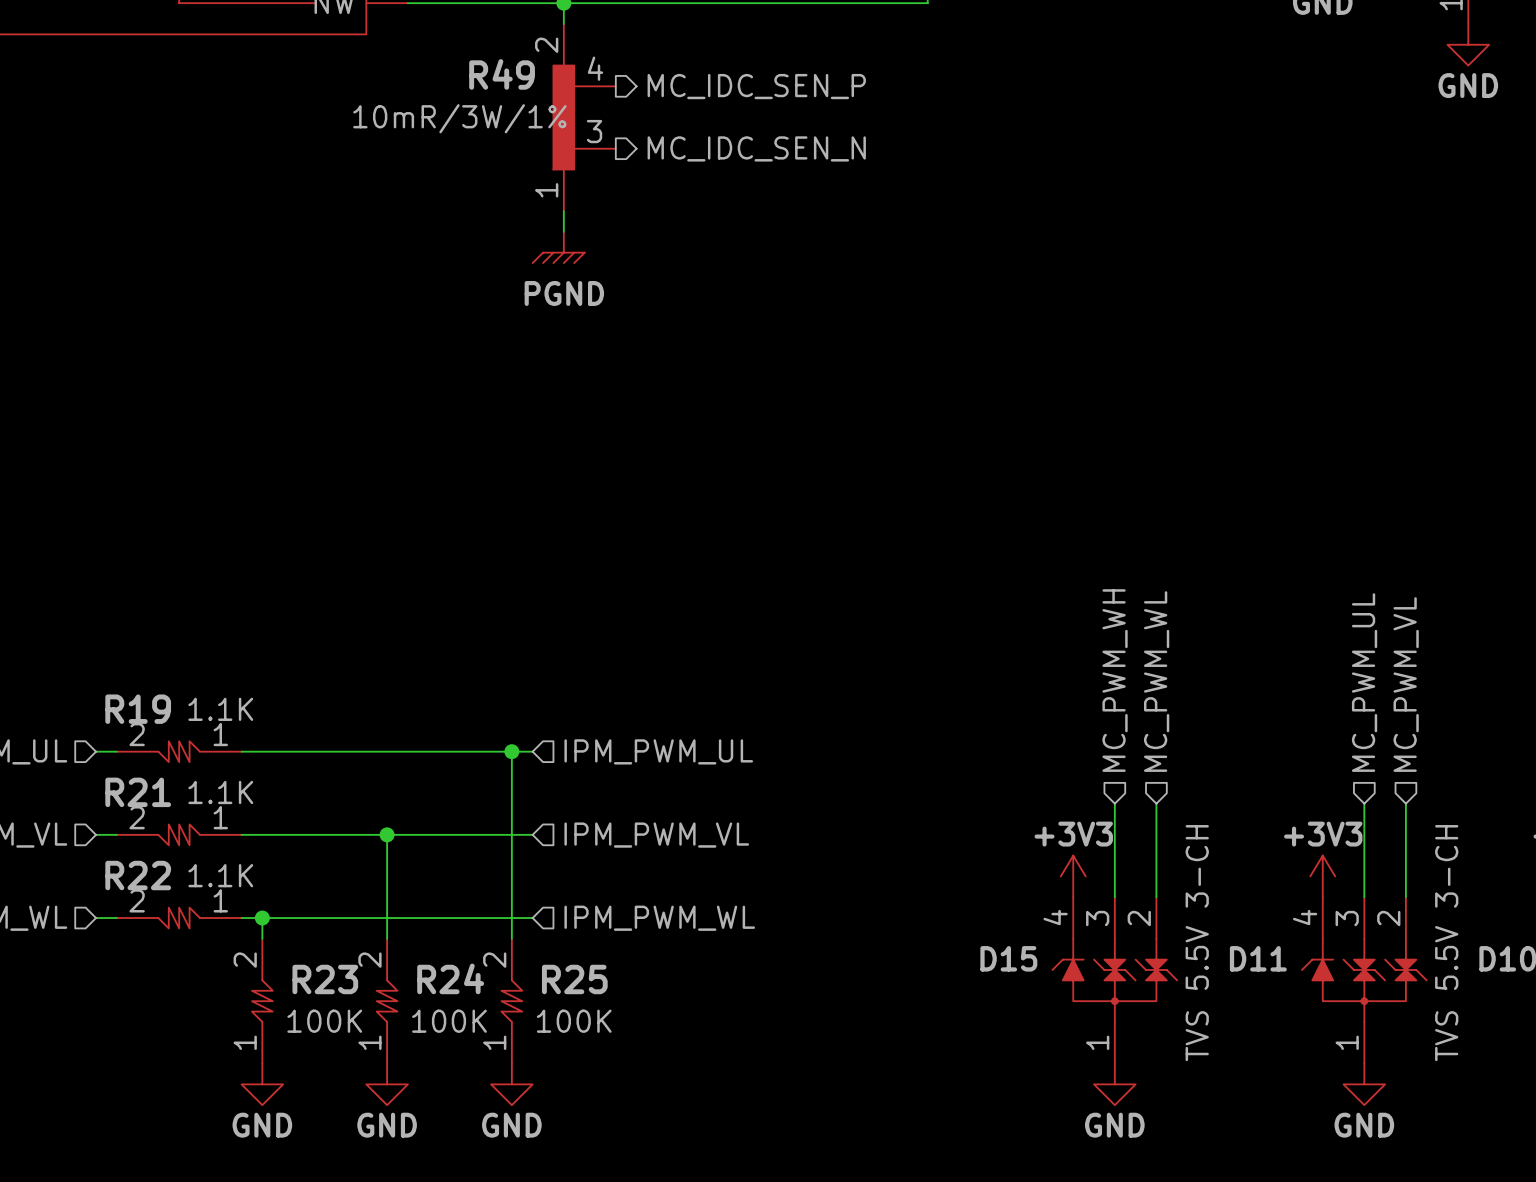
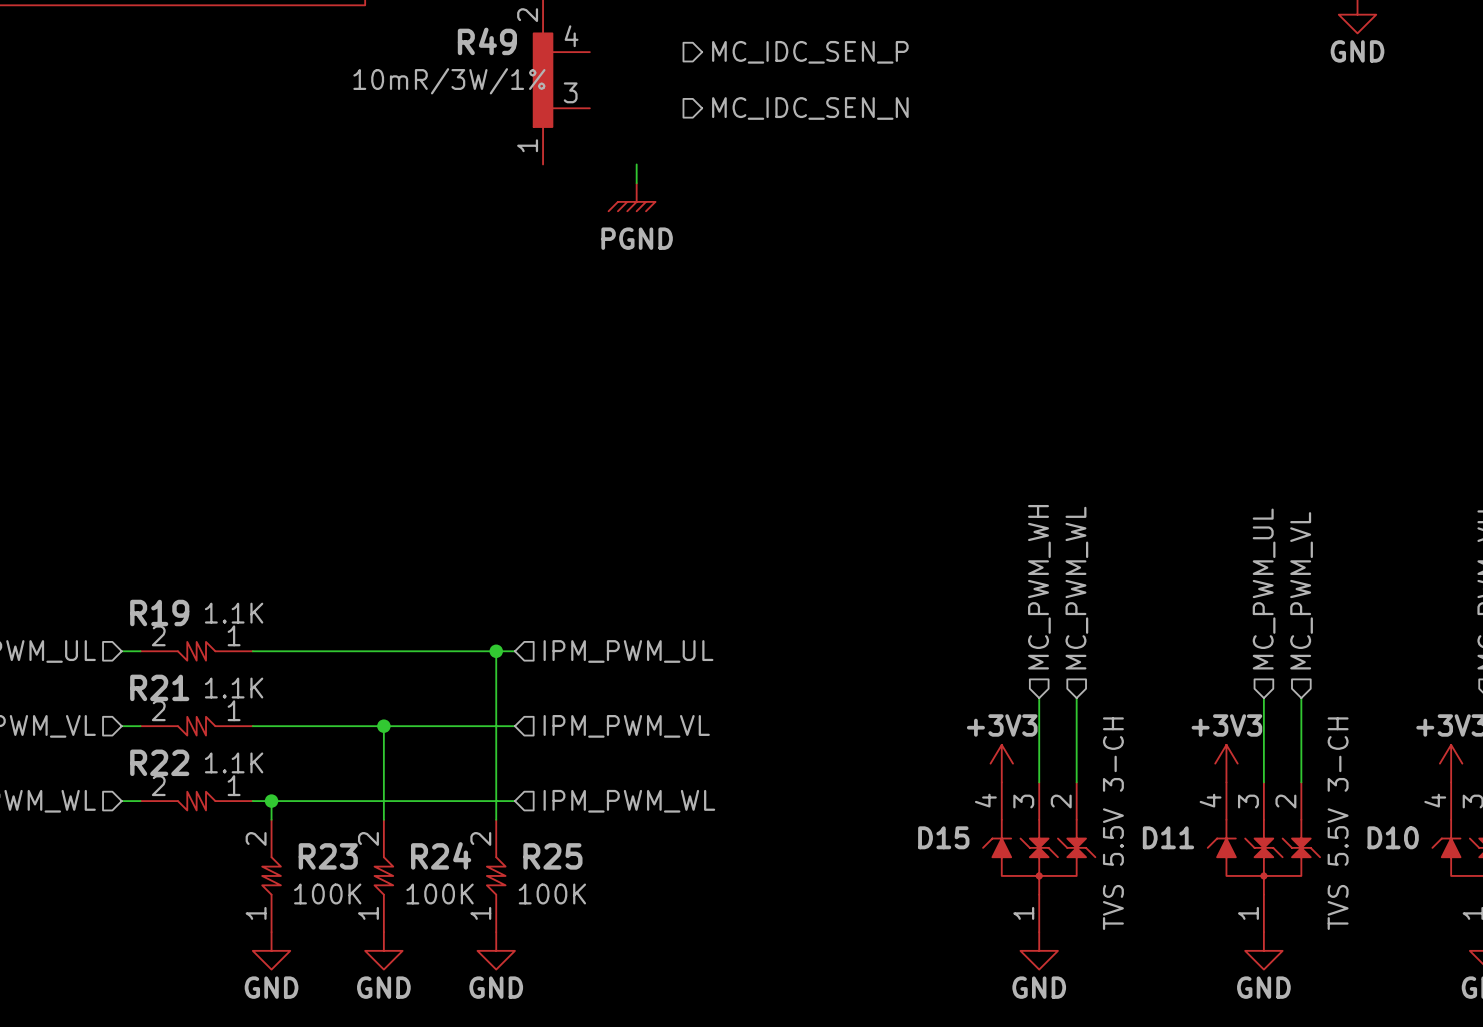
hierarchical label position: MC_IDC_SEN_P (756, 86) -> MC_IDC_SEN_P (810, 52)
hierarchical label position: MC_IDC_SEN_N (756, 148) -> MC_IDC_SEN_N (810, 108)
wire: (563, 211) (563, 231) -> (636, 164) (636, 183)
power symbol position: PGND (558, 247) -> PGND (631, 197)

